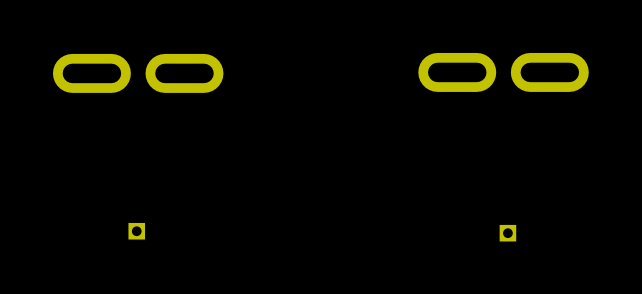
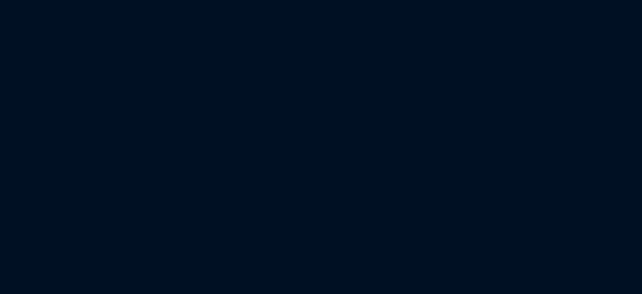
part: (503, 72) -> none
part: (138, 73) -> none
part: (136, 231) -> none
part: (507, 233) -> none

